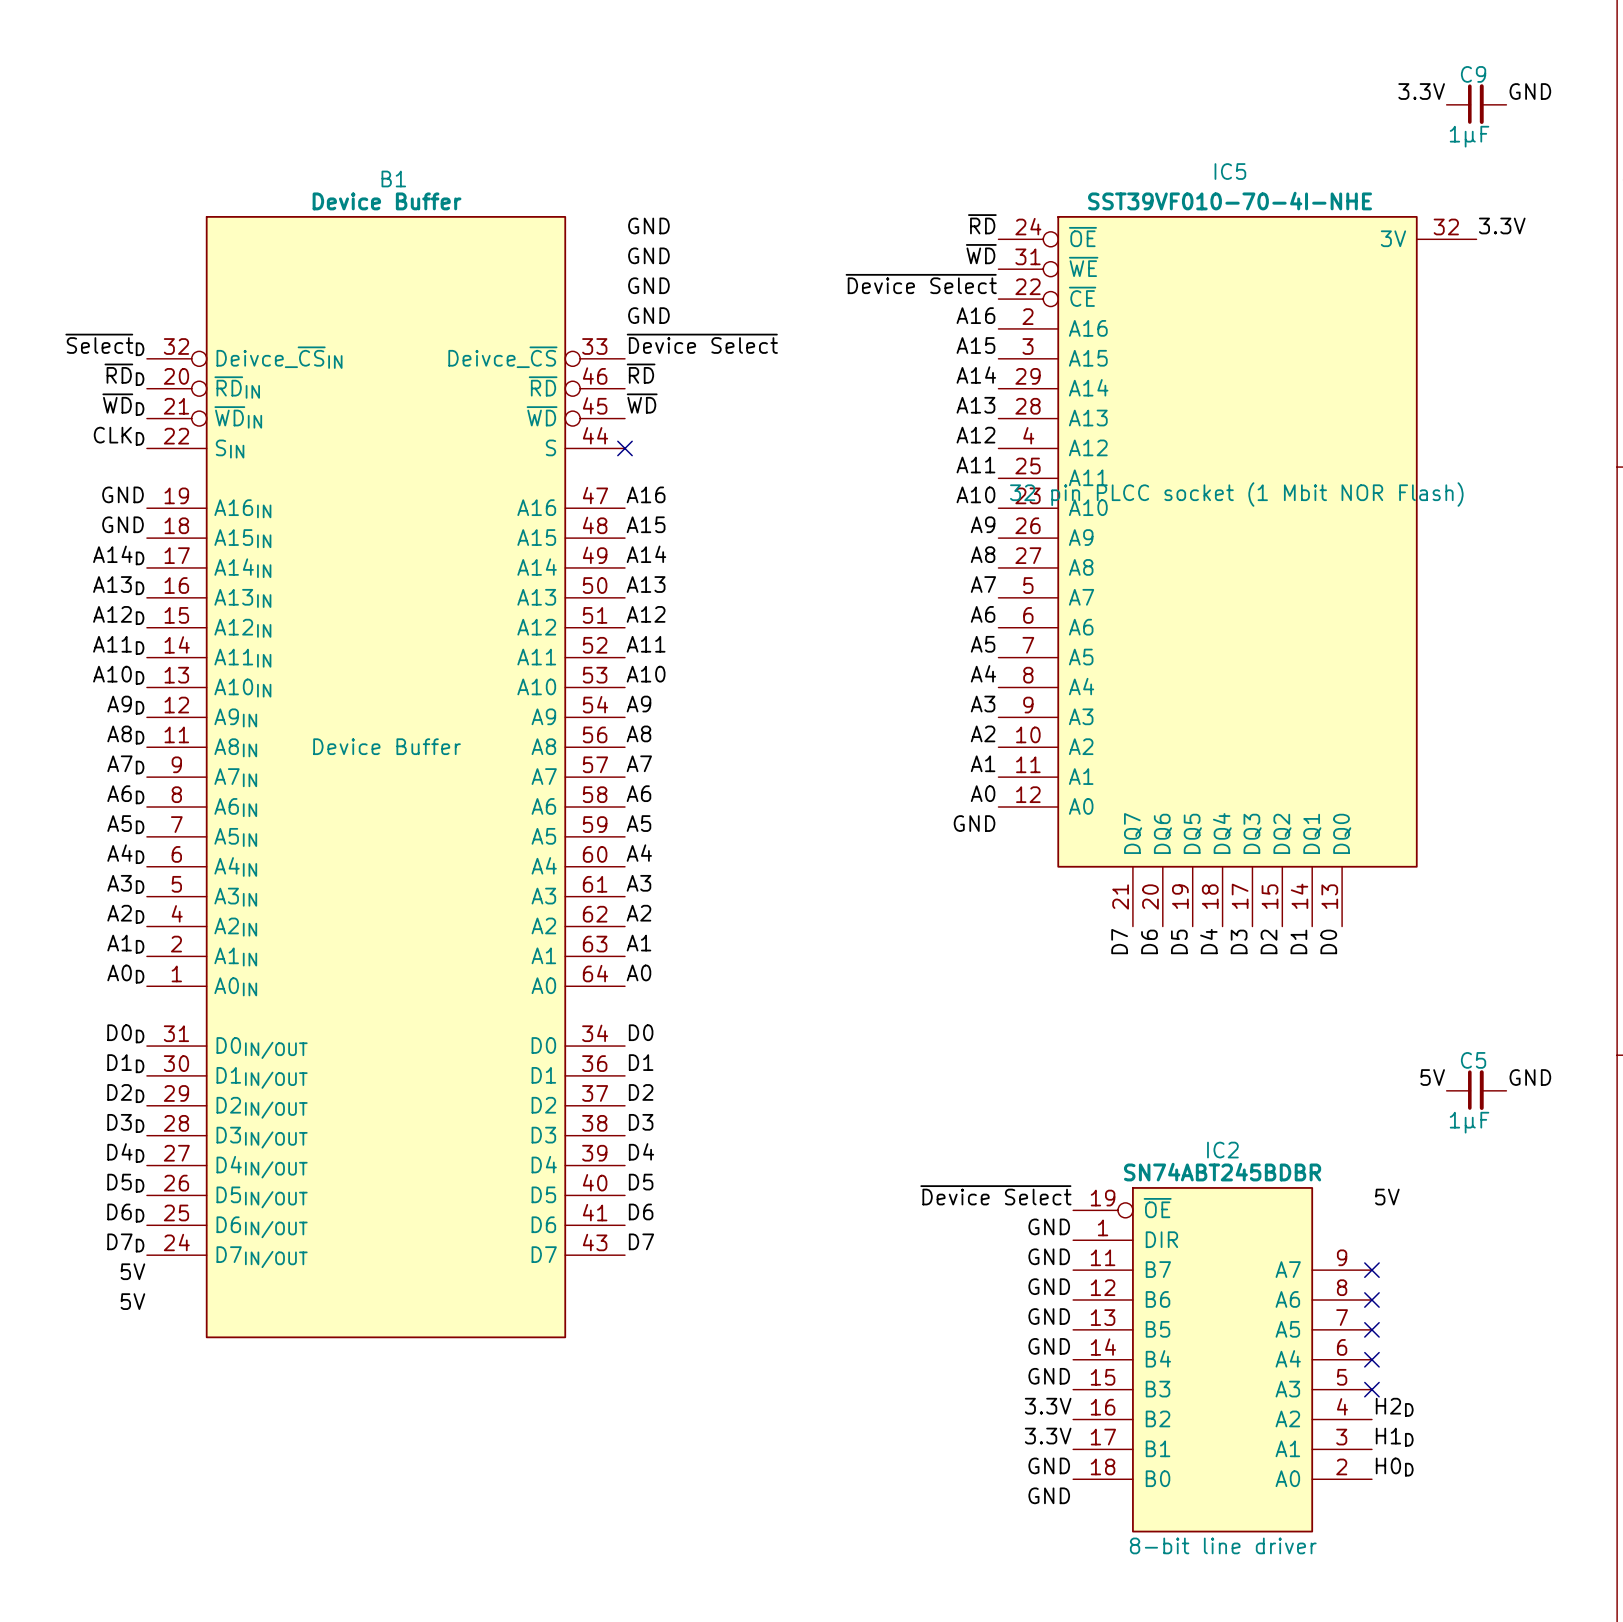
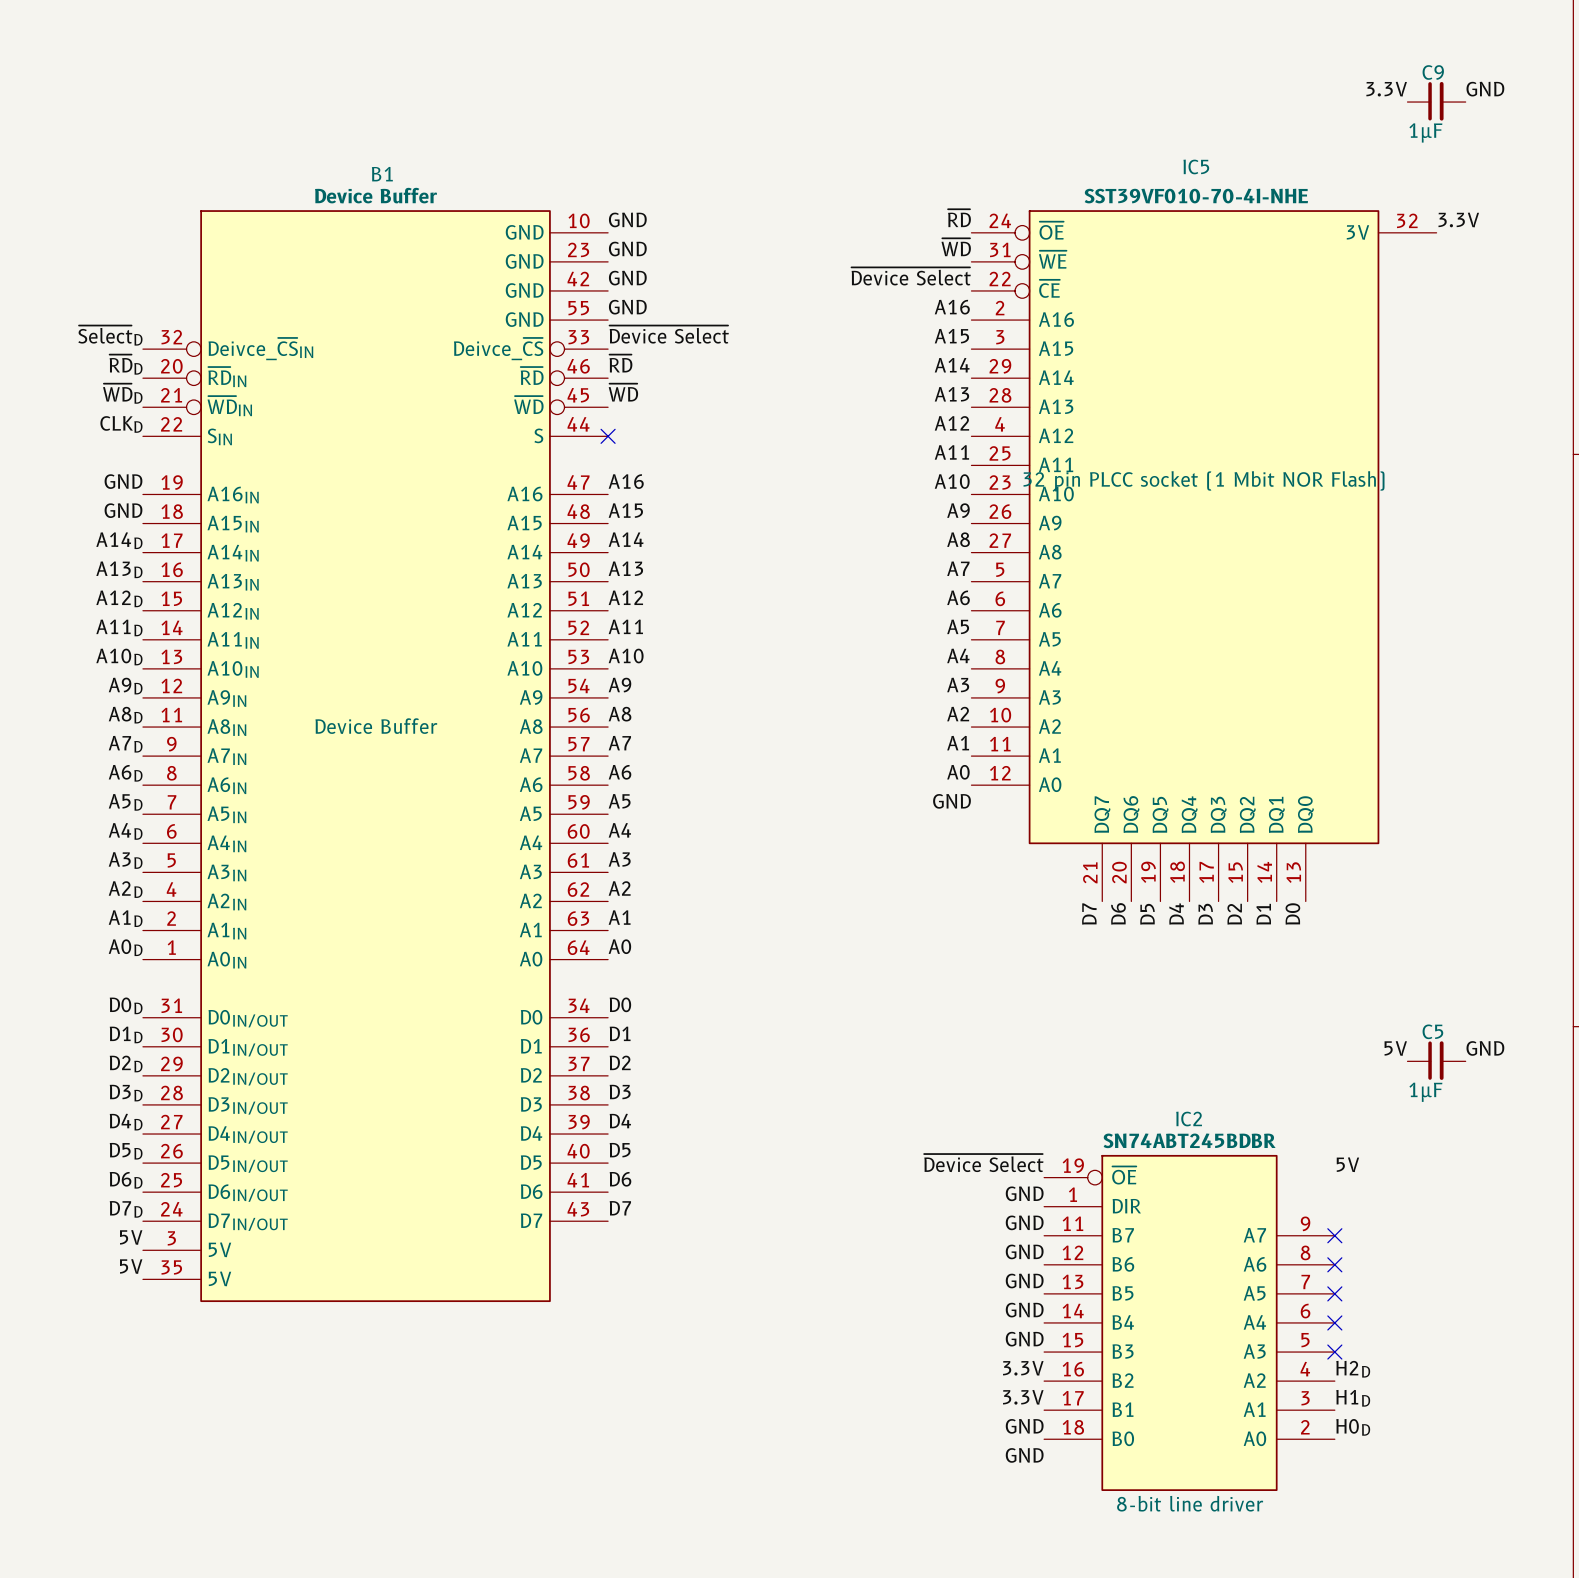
B1 symbol: [146, 216, 625, 1339] -> [142, 210, 609, 1303]

